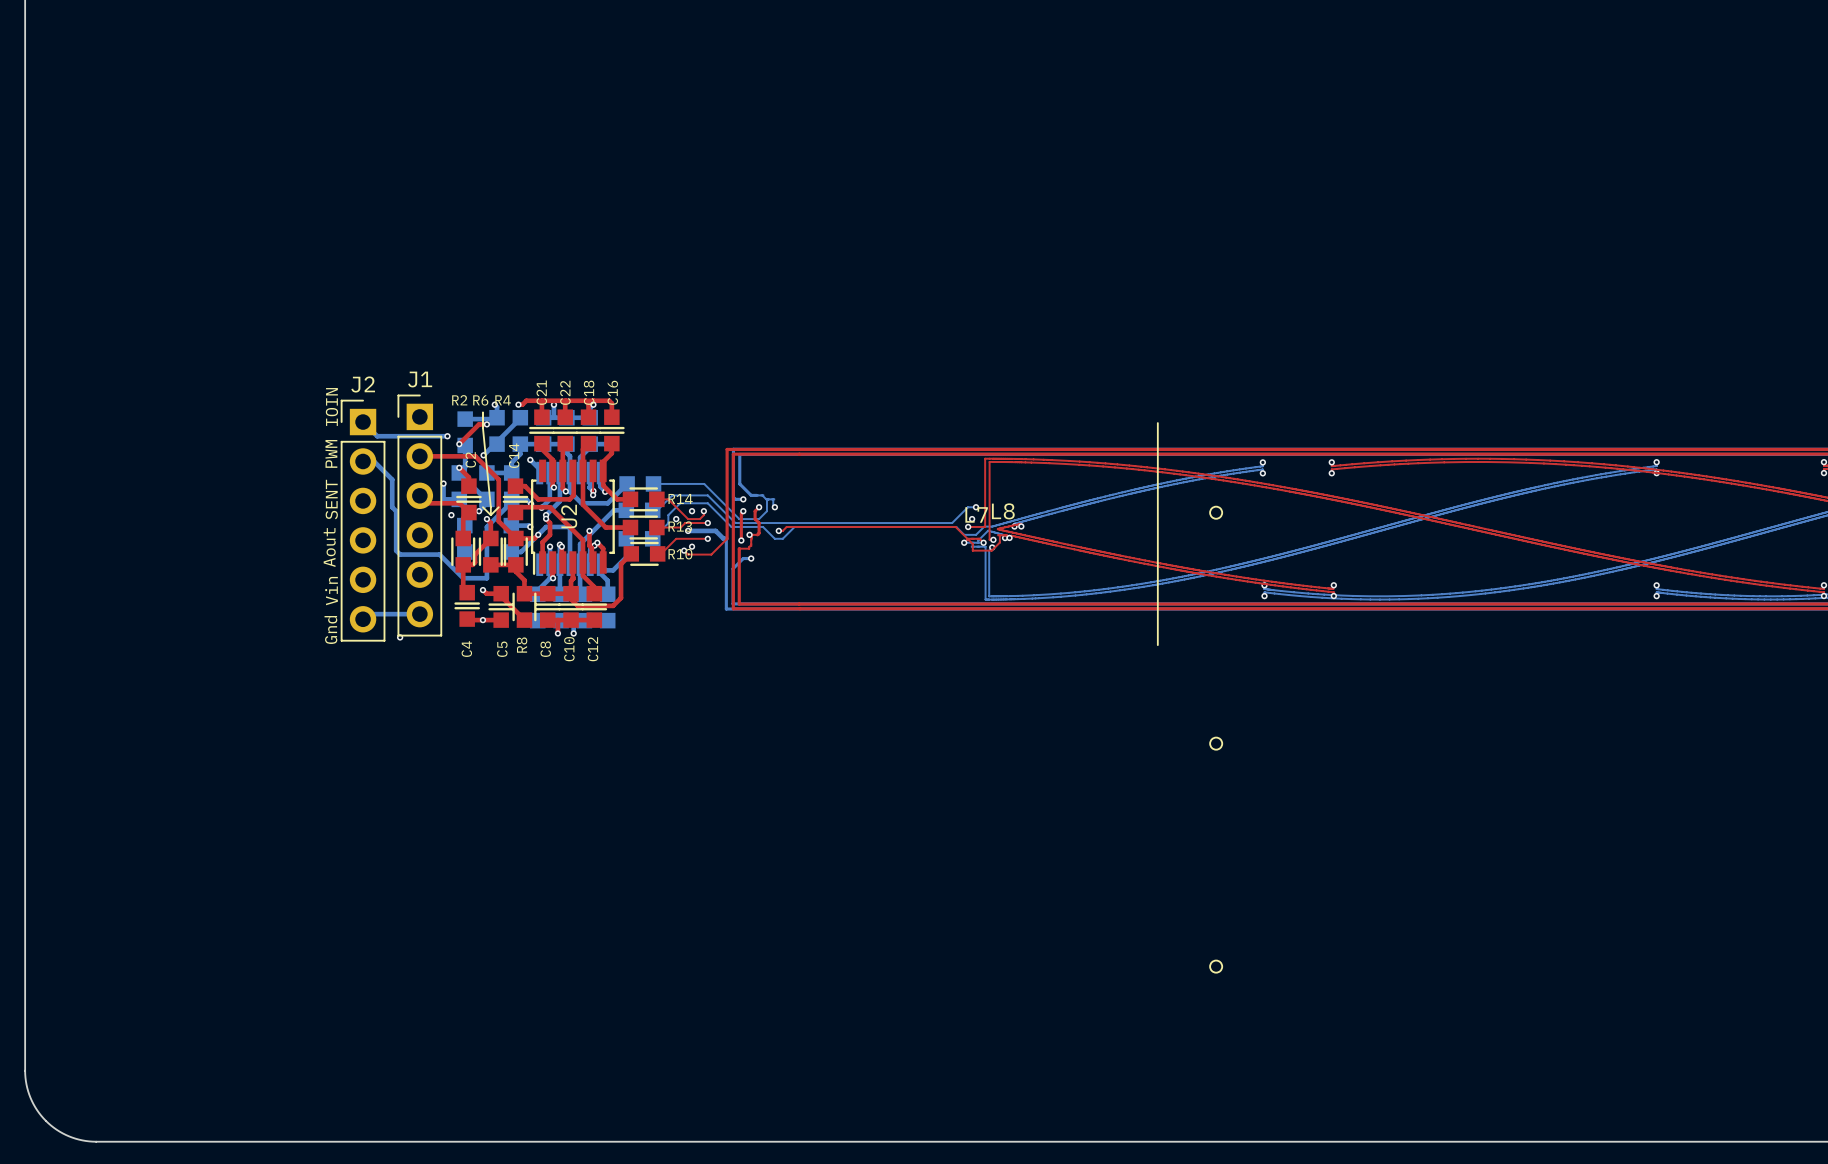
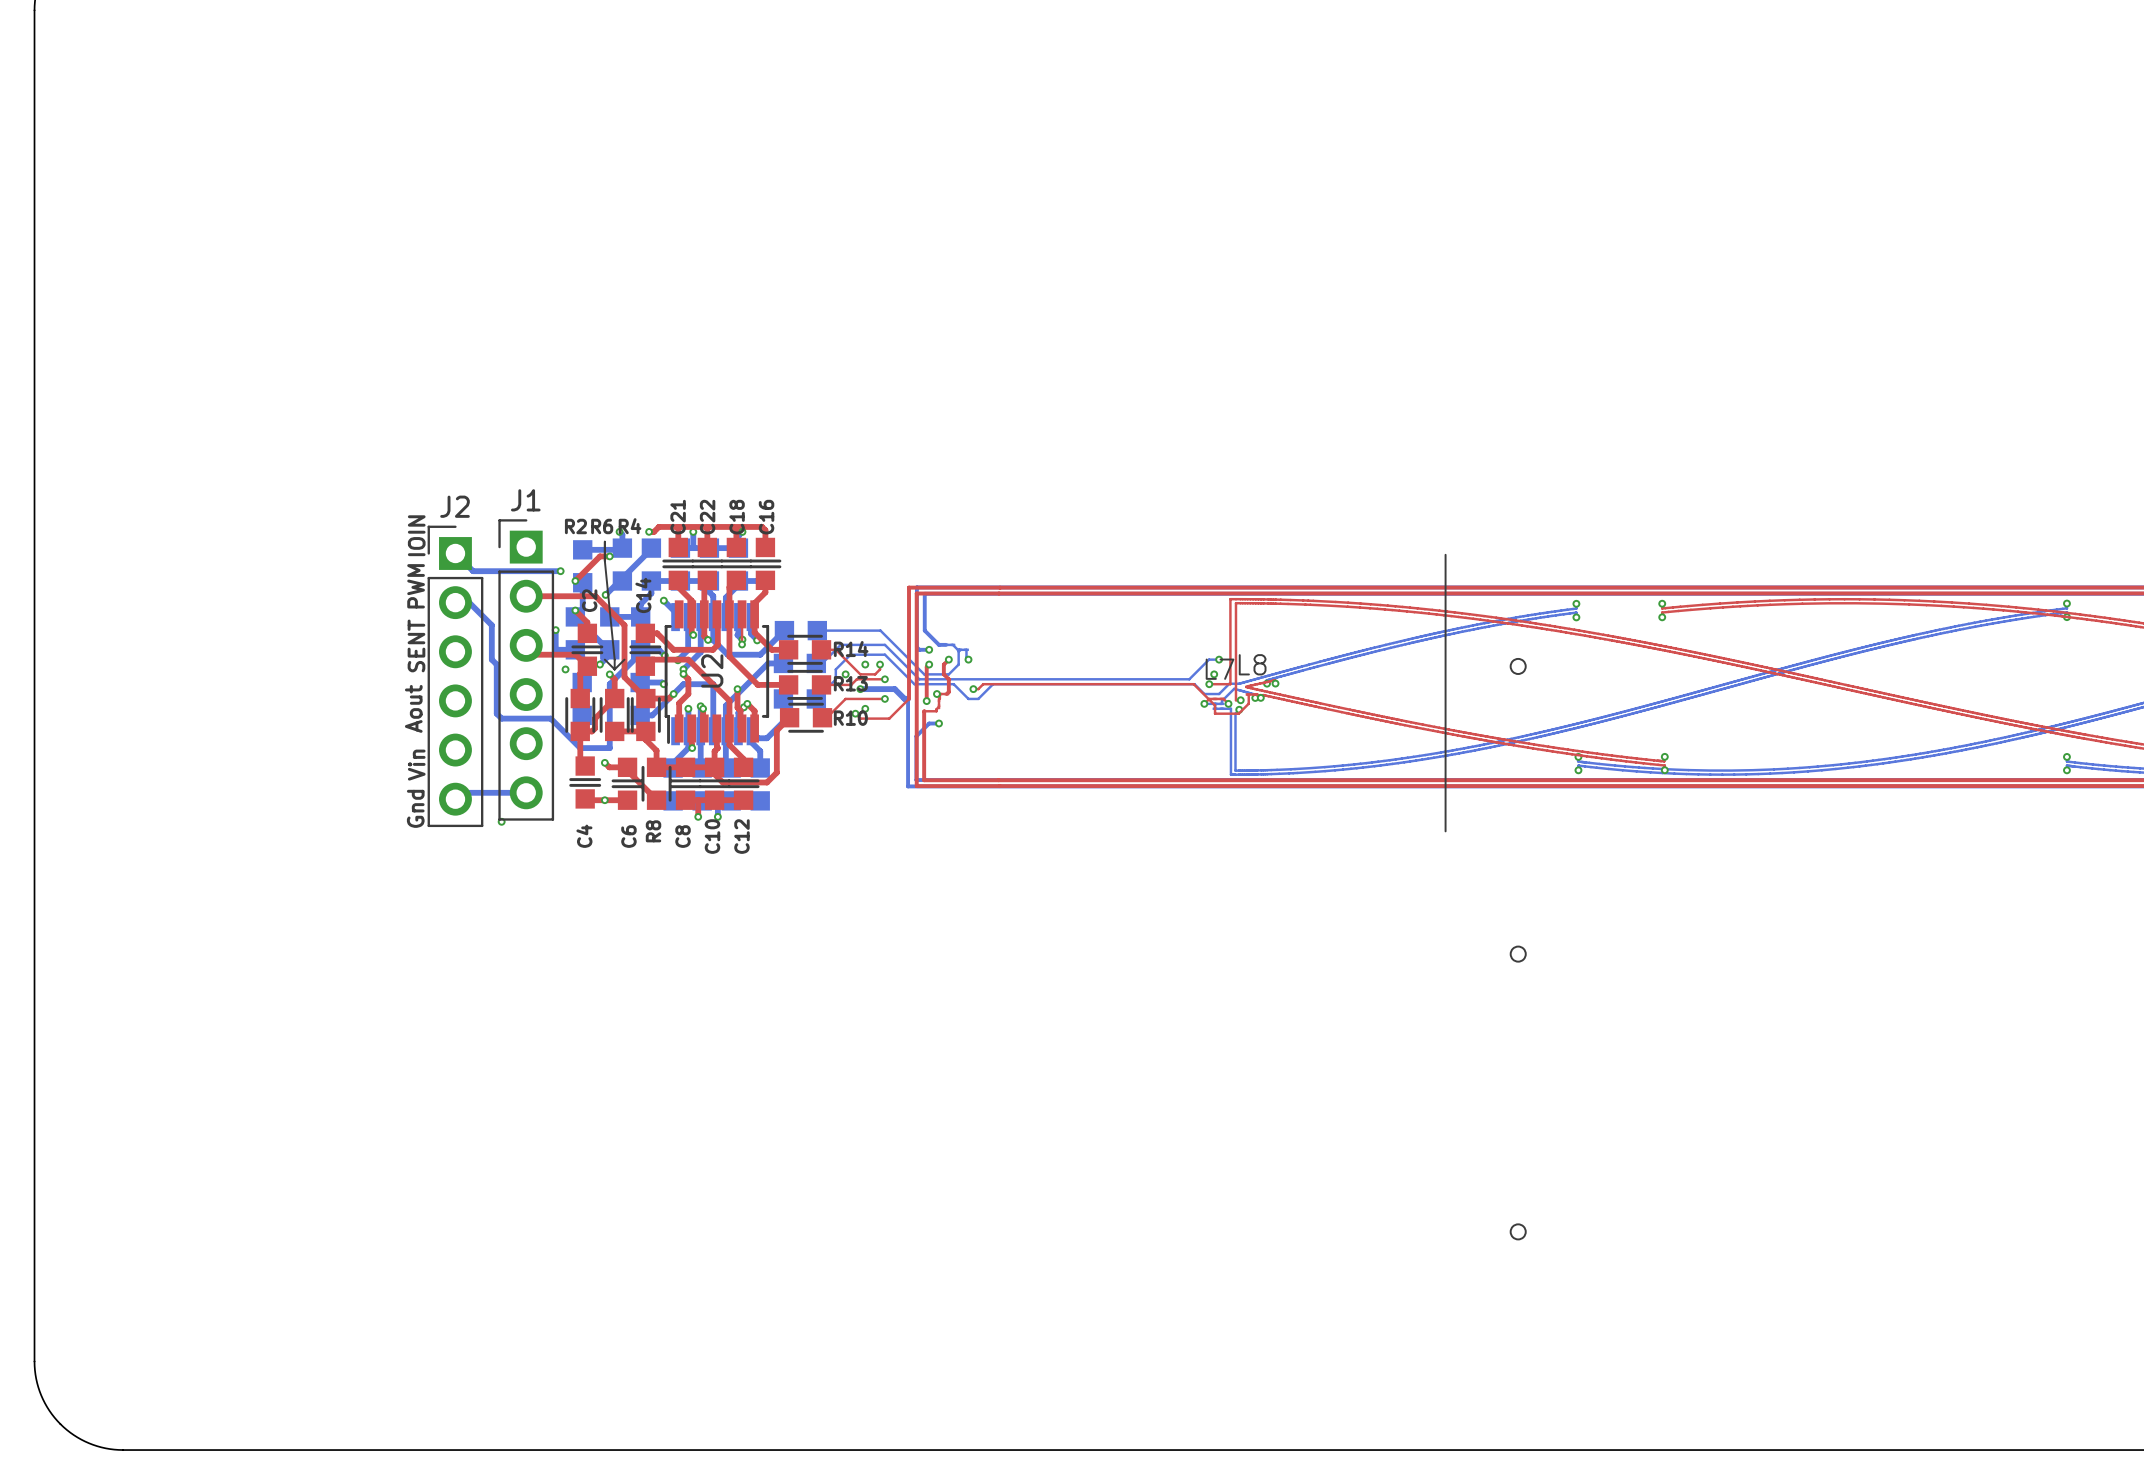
C5 name: C5 (502, 649) -> C6 (628, 836)

